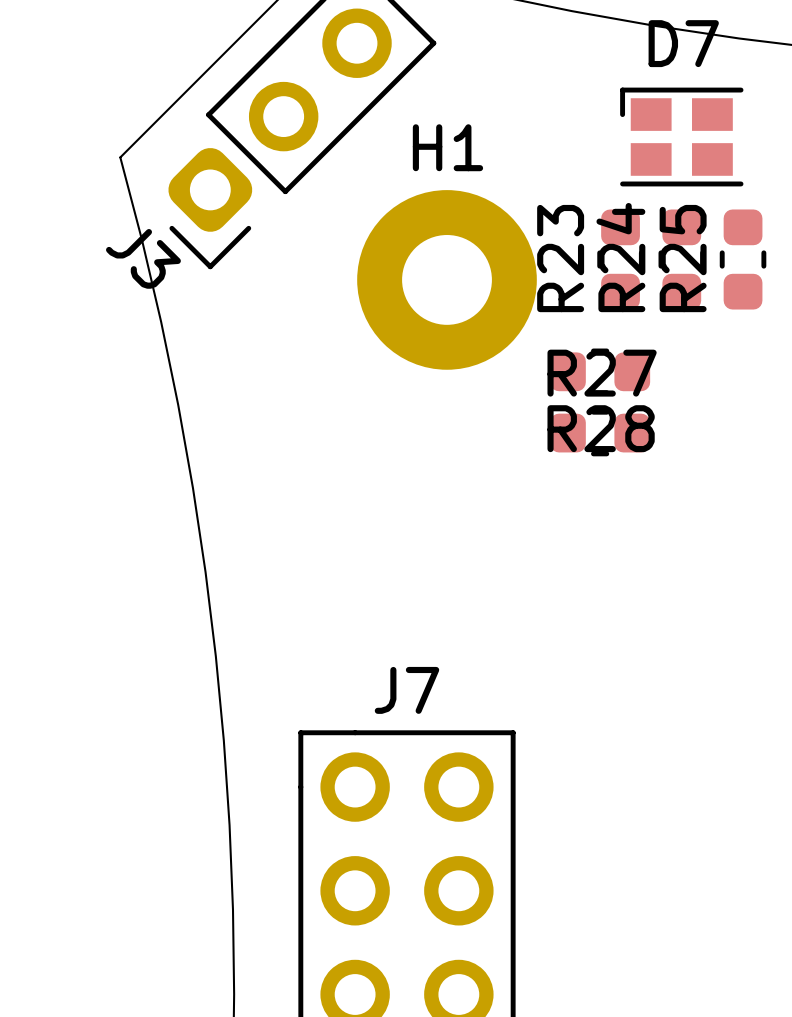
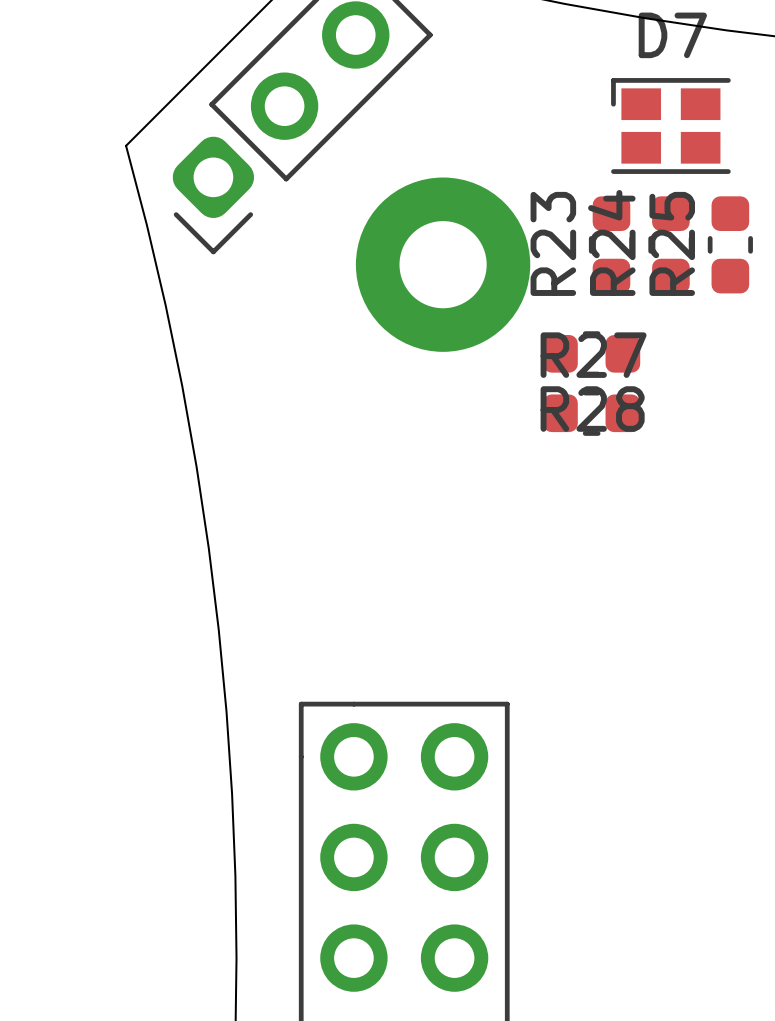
H1 name: H1 (447, 147) -> none
J3 name: J3 (143, 258) -> none
J7 name: J7 (406, 690) -> none

